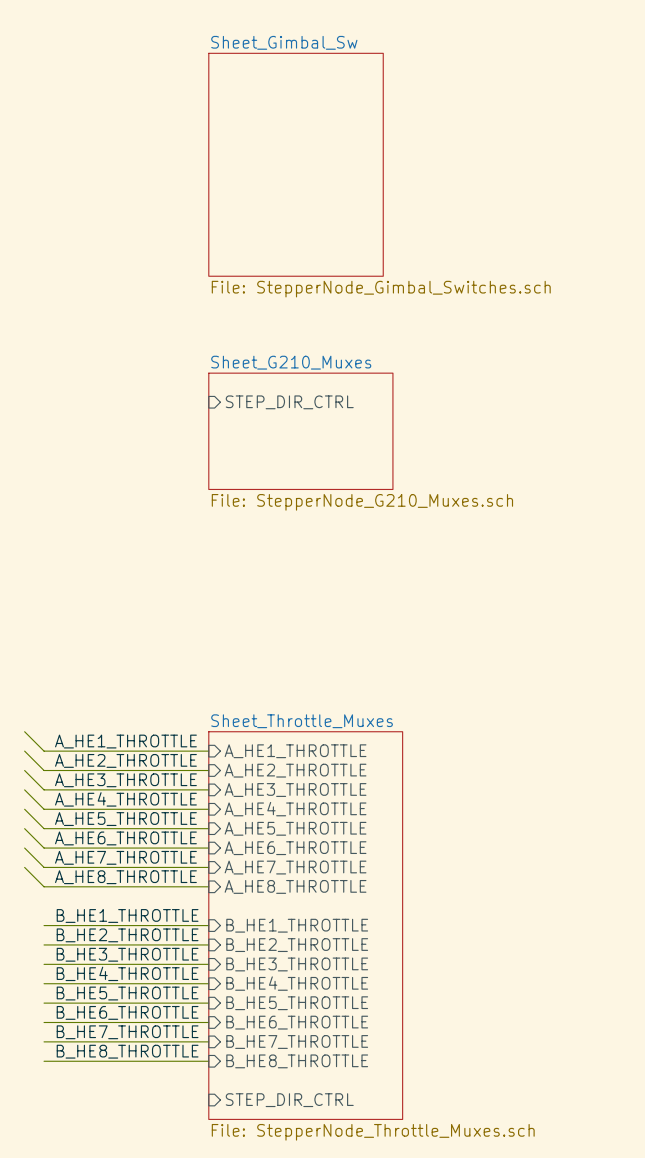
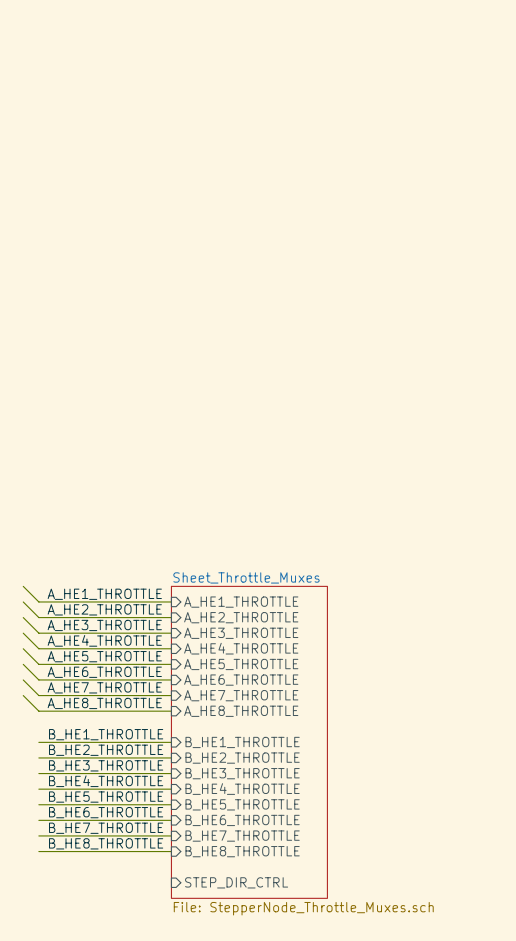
sheet Sheet_Gimbal_Sw: File: StepperNode_Gimbal_Switches.sch (296, 164) -> none
sheet pin: STEP_DIR_CTRL (289, 402) -> none
sheet Sheet_G210_Muxes: File: StepperNode_G210_Muxes.sch (300, 431) -> none

